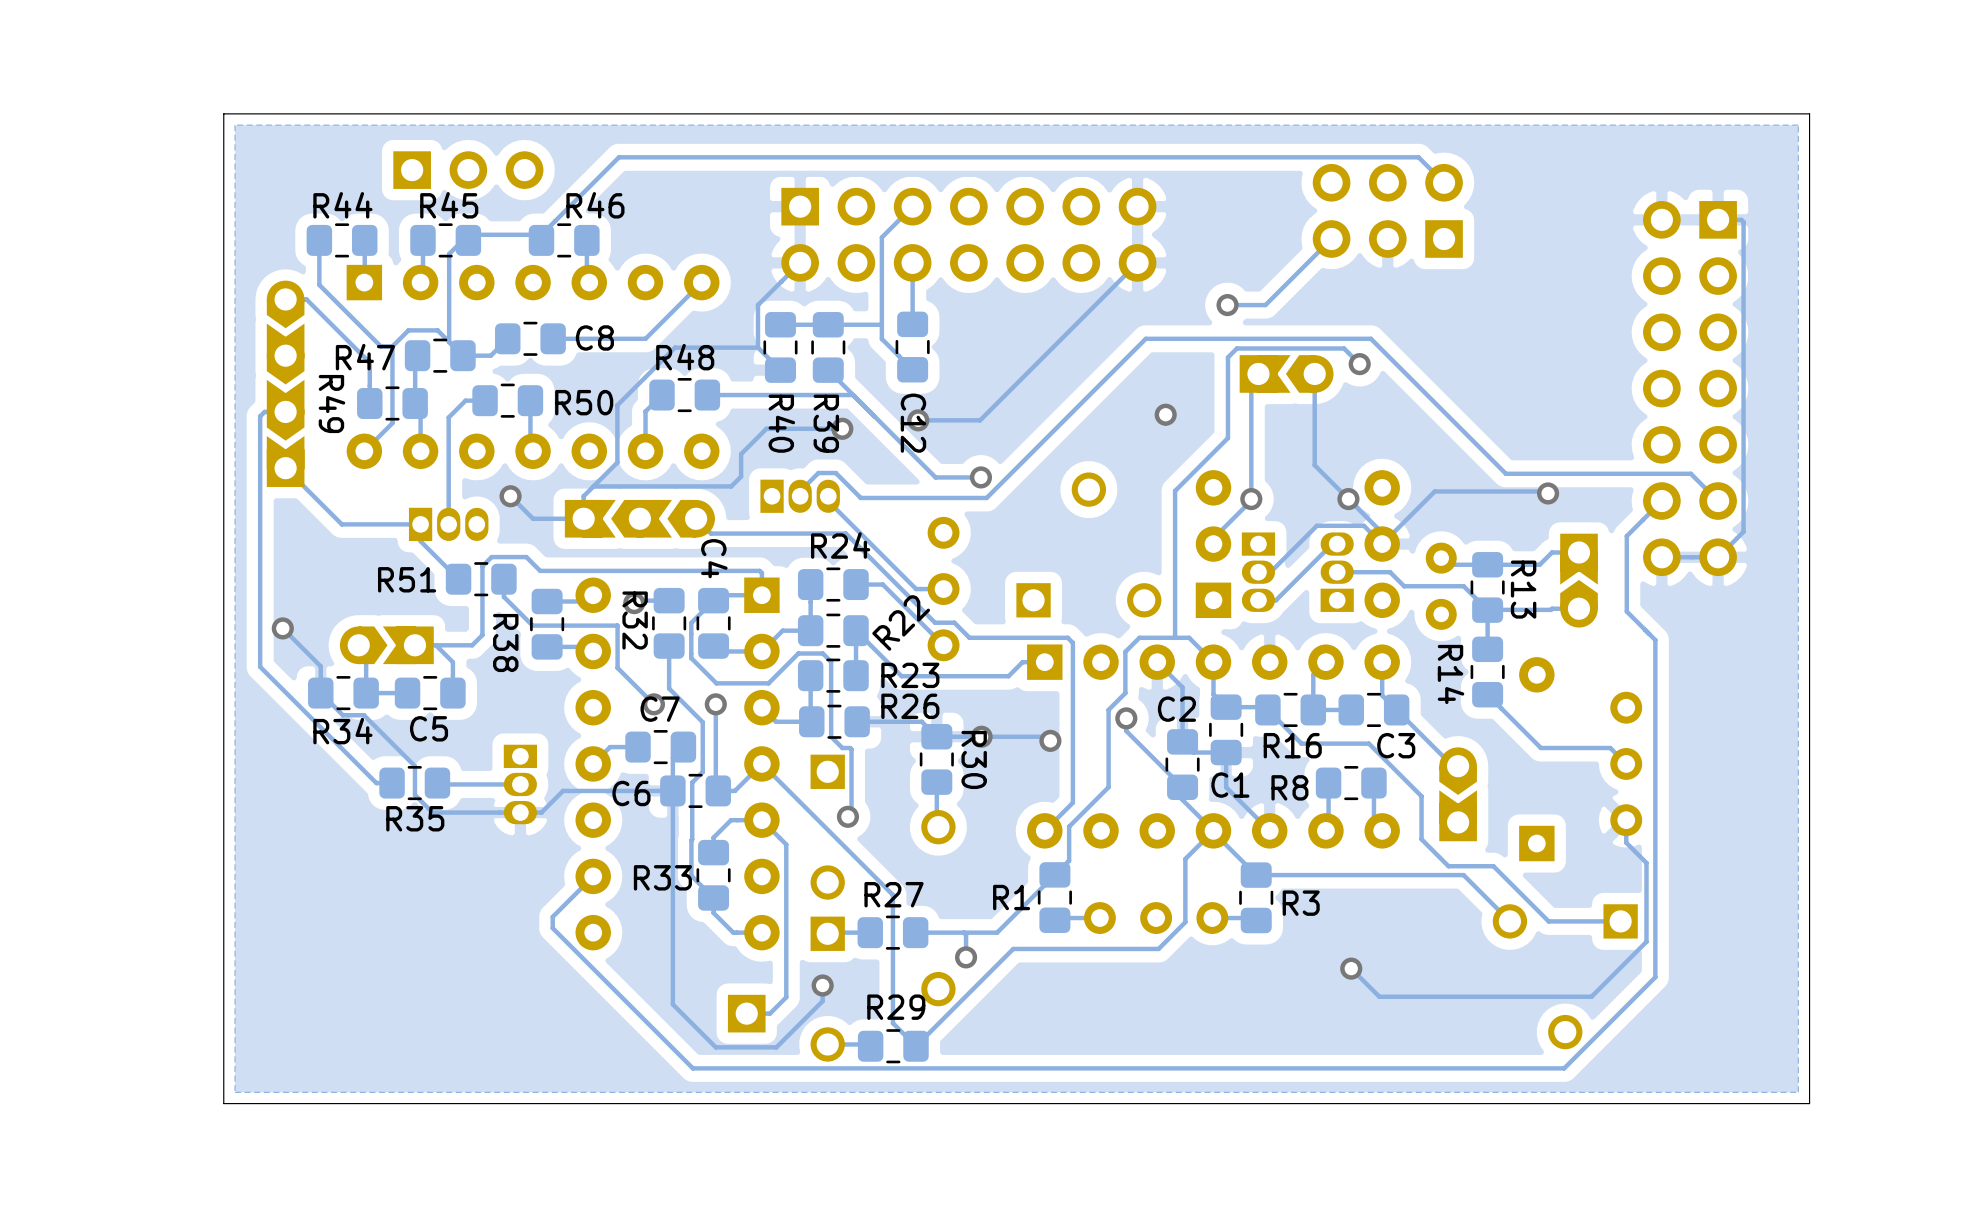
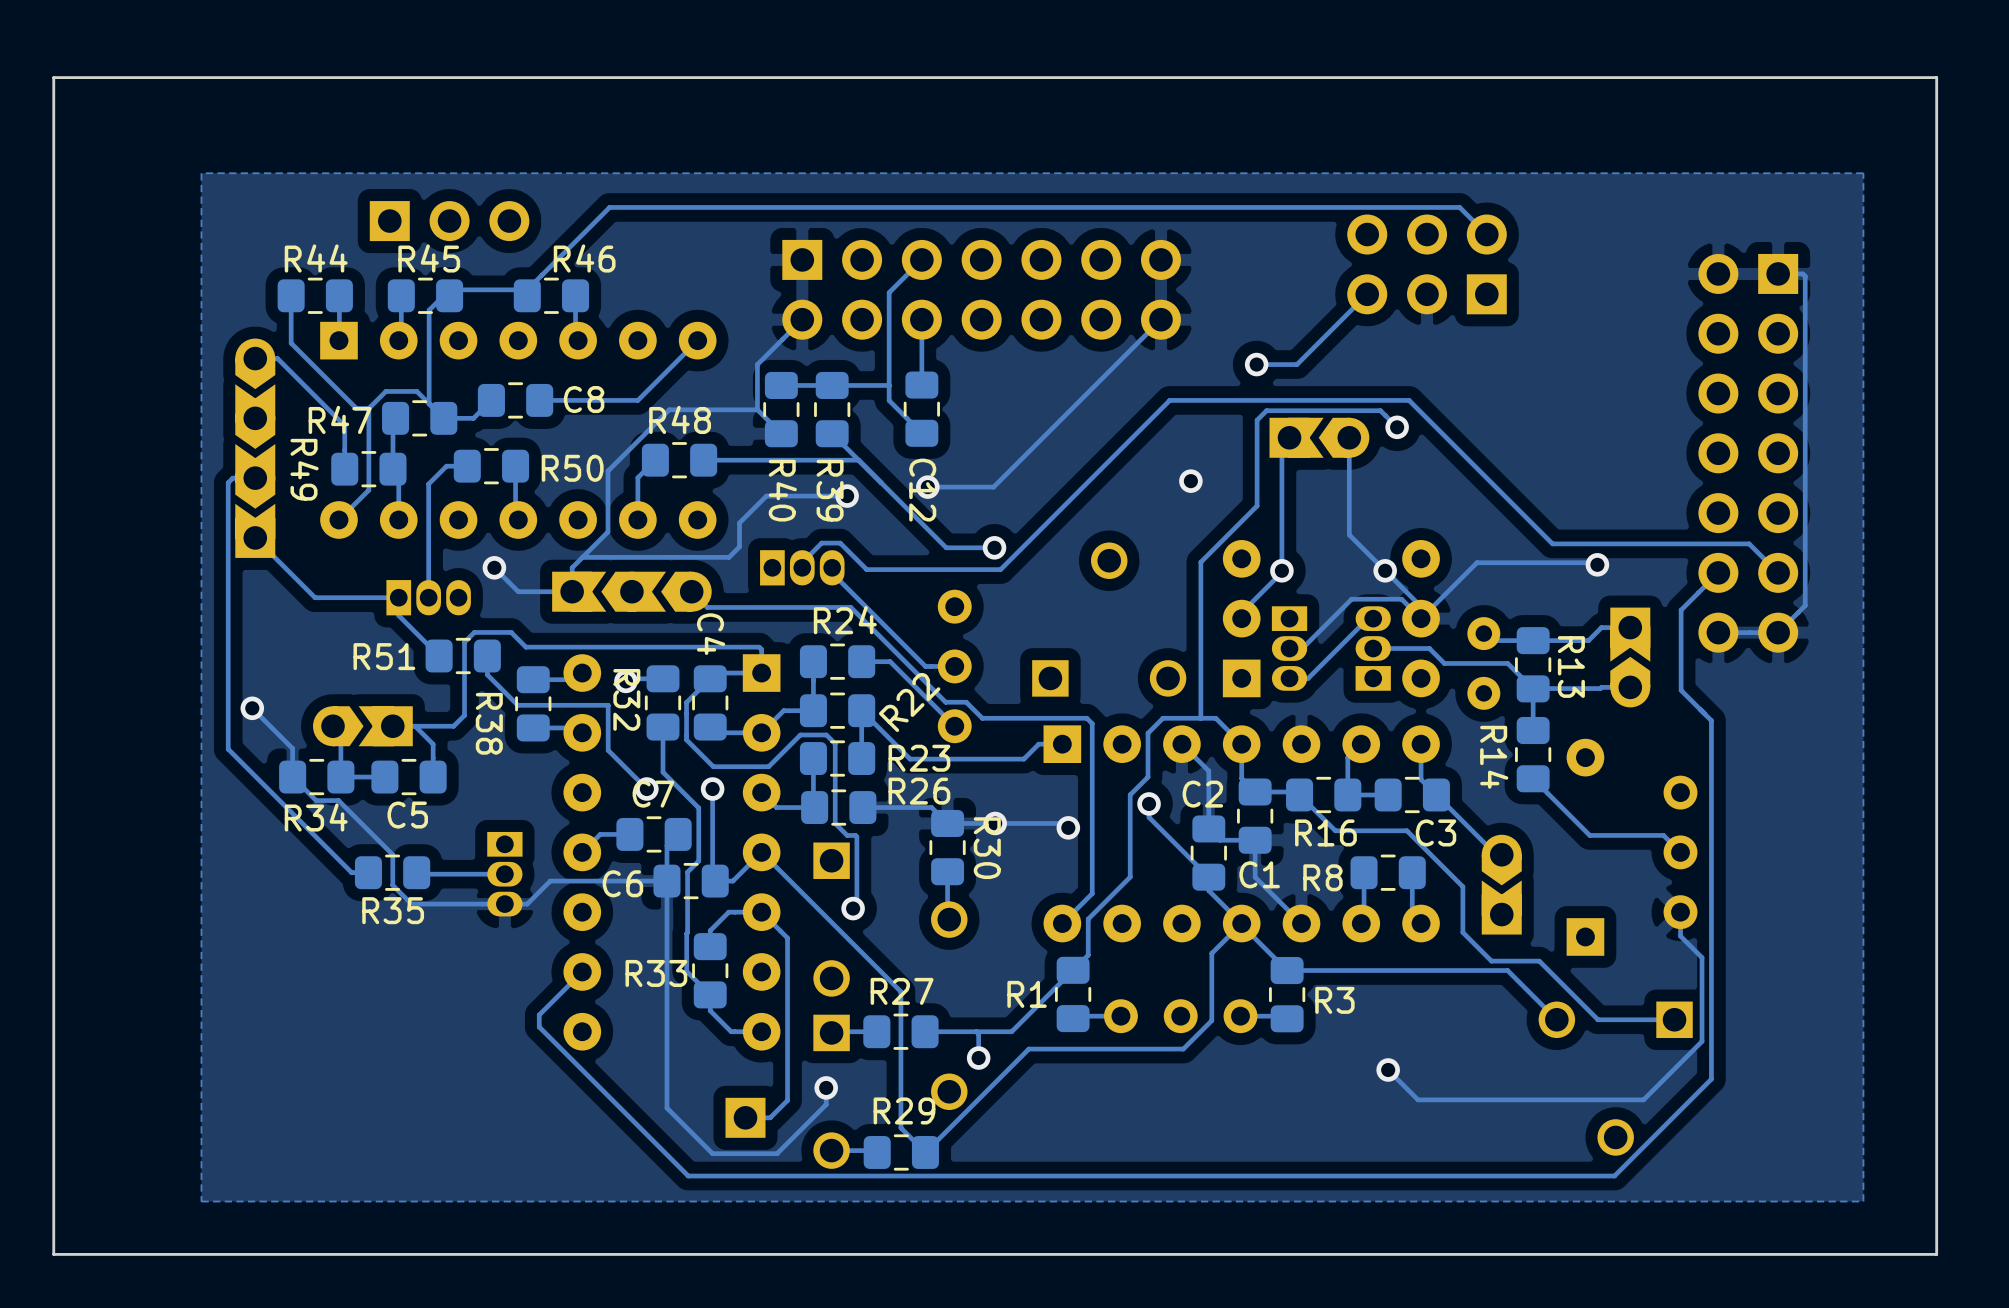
board edge: (1809, 113) (1809, 1103) (223, 1103) (223, 113) (1809, 113) -> (1936, 77) (1936, 1254) (53, 1254) (53, 77) (1936, 77)

